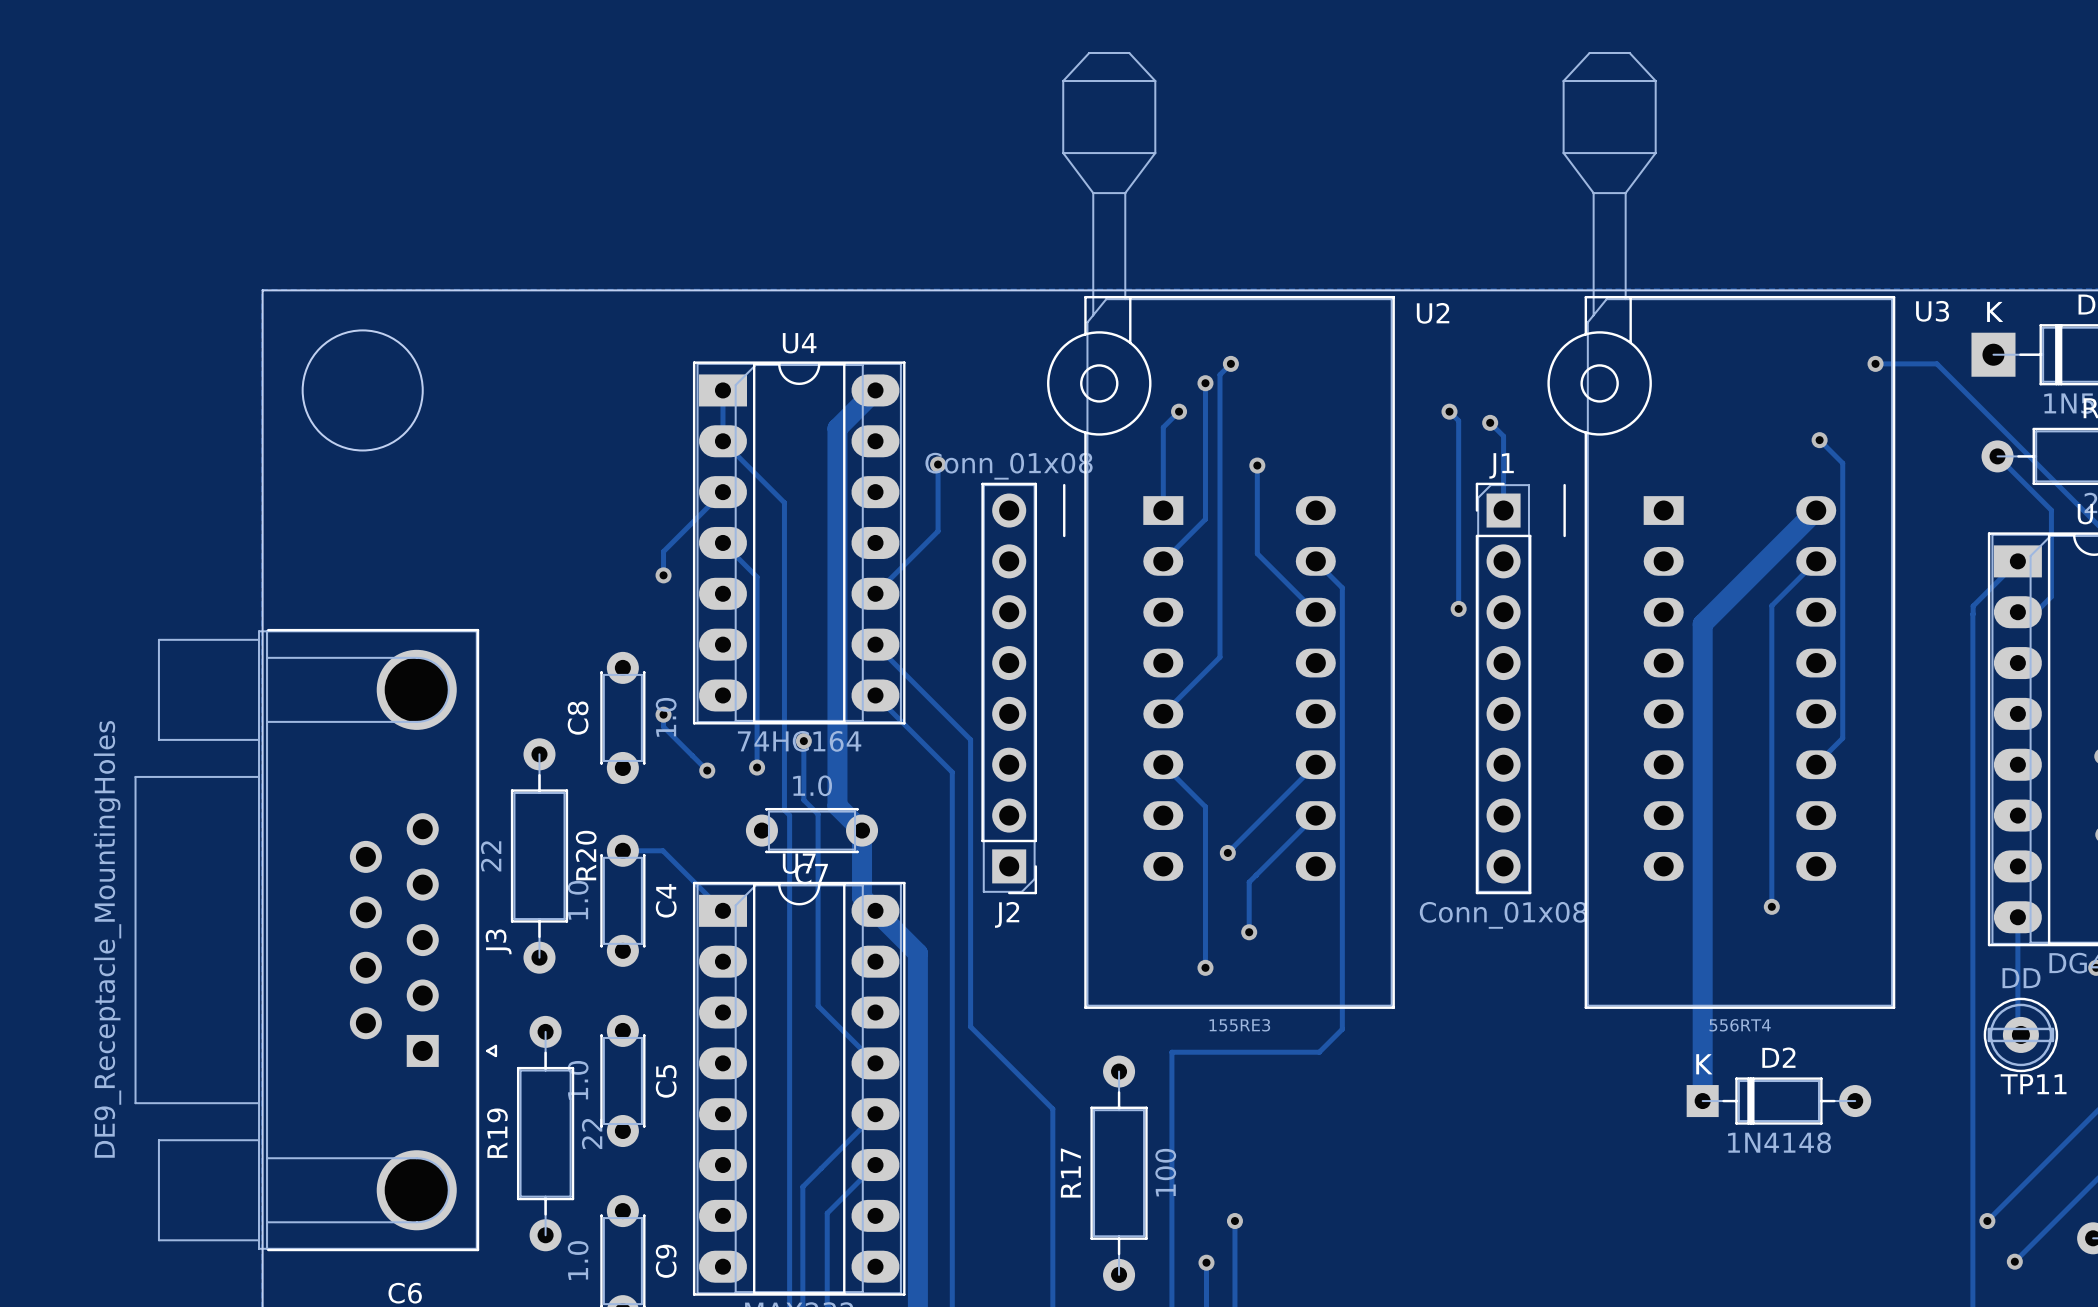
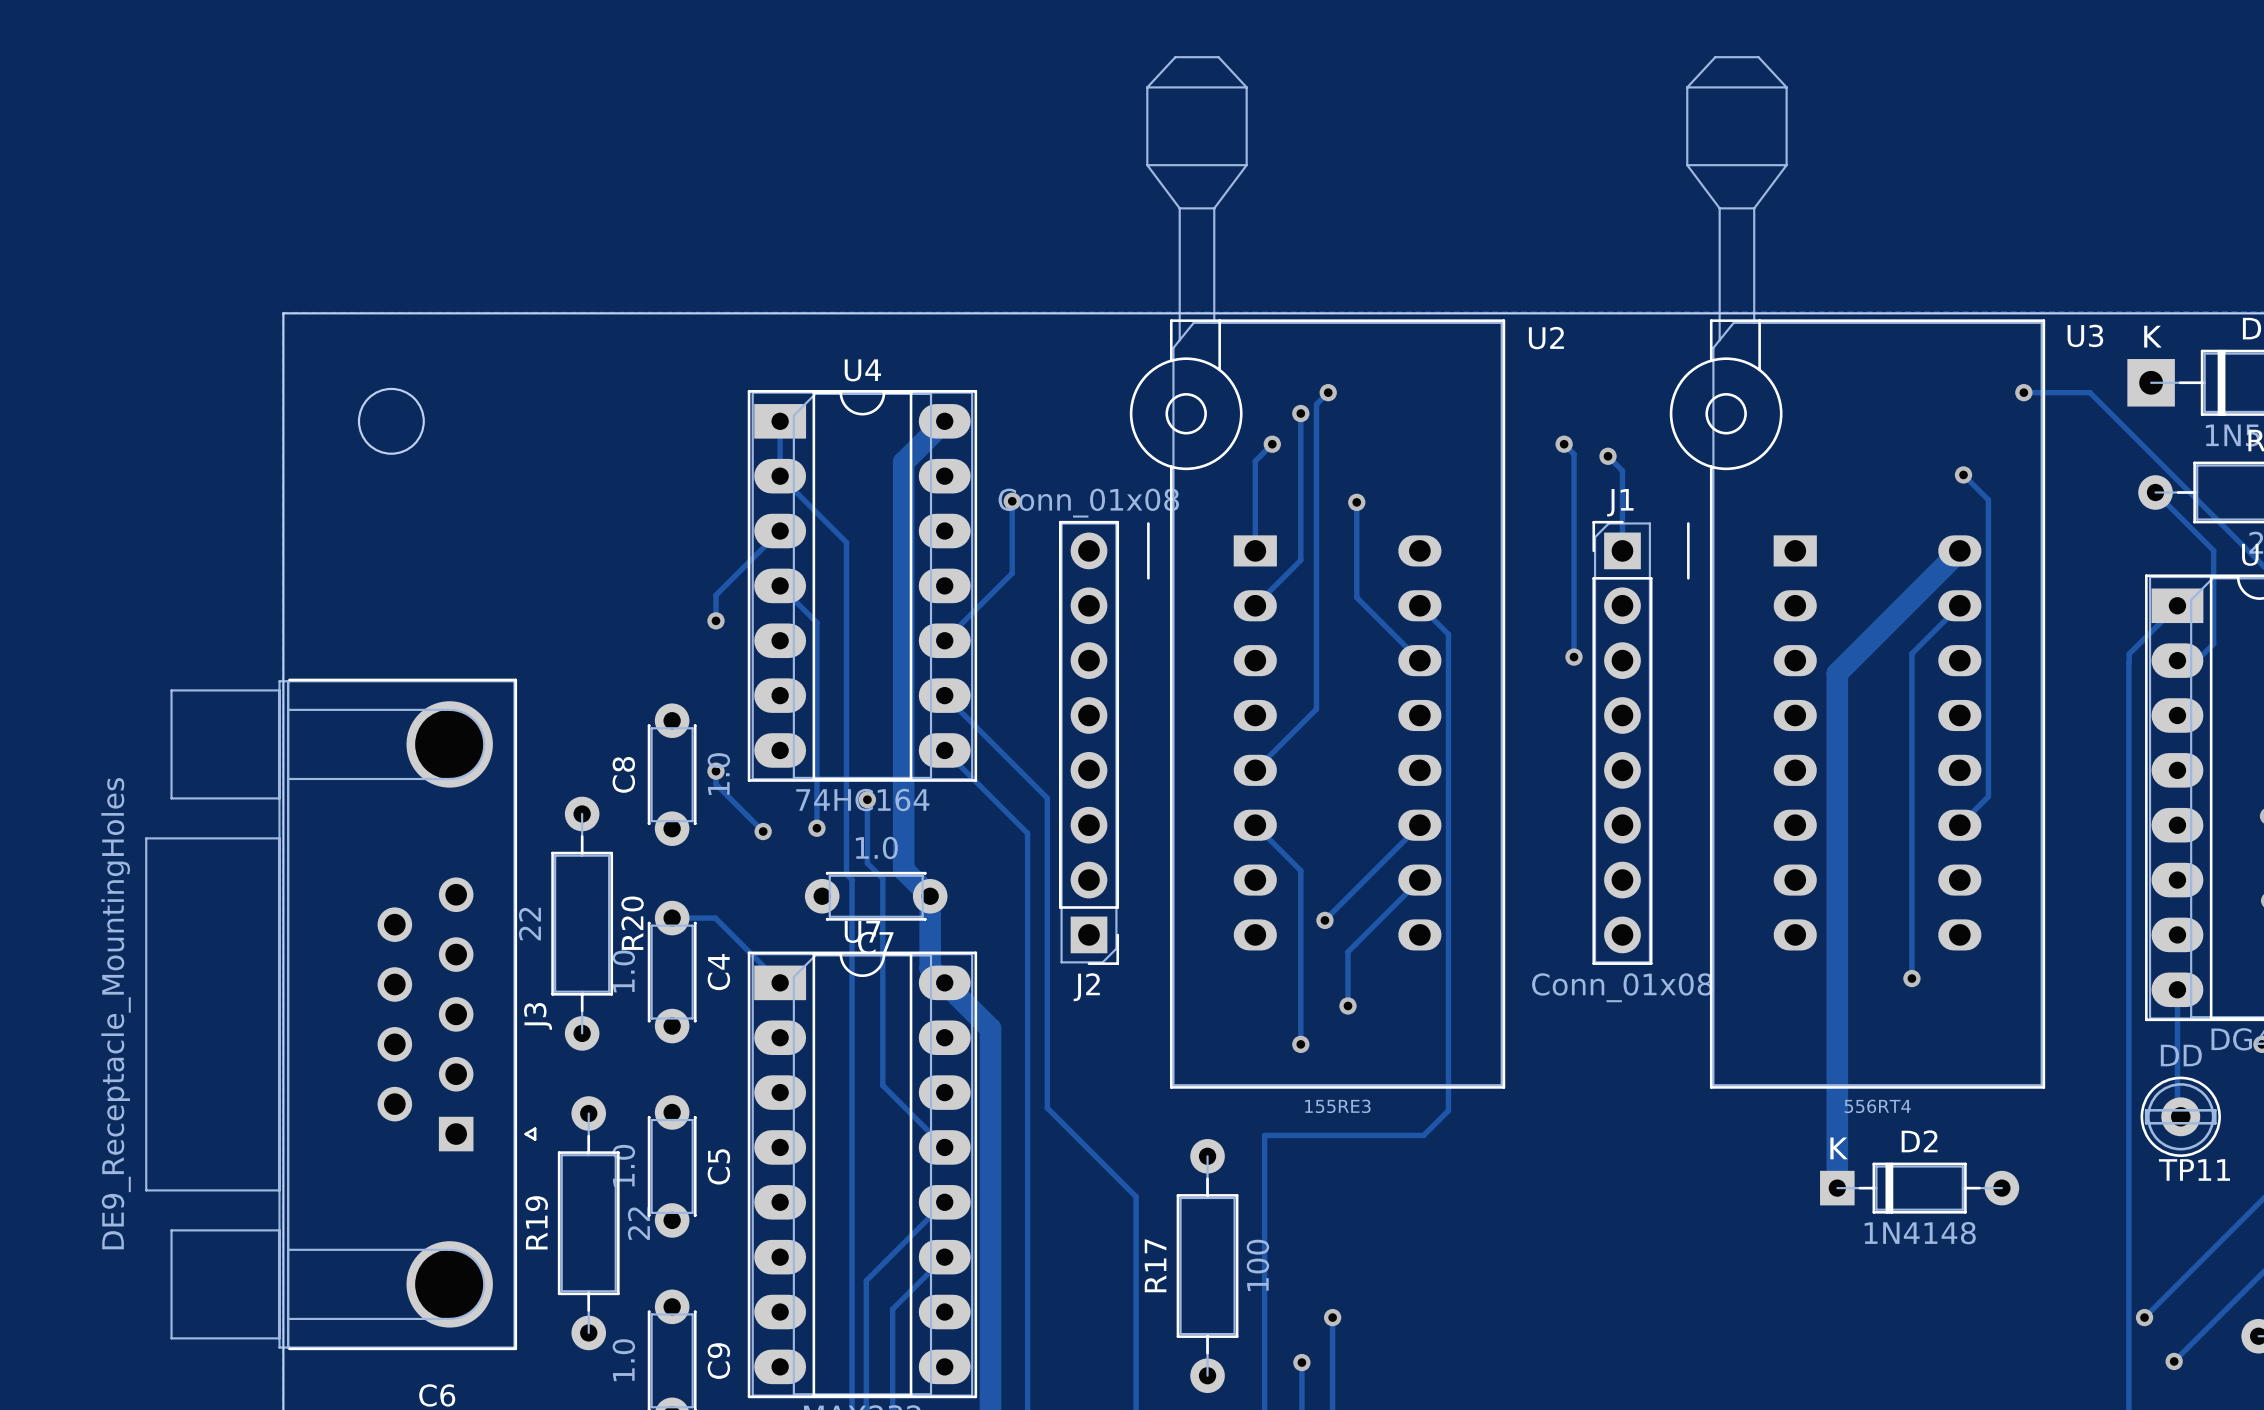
round board edge size: [301, 329, 424, 452] -> [357, 387, 425, 455]

